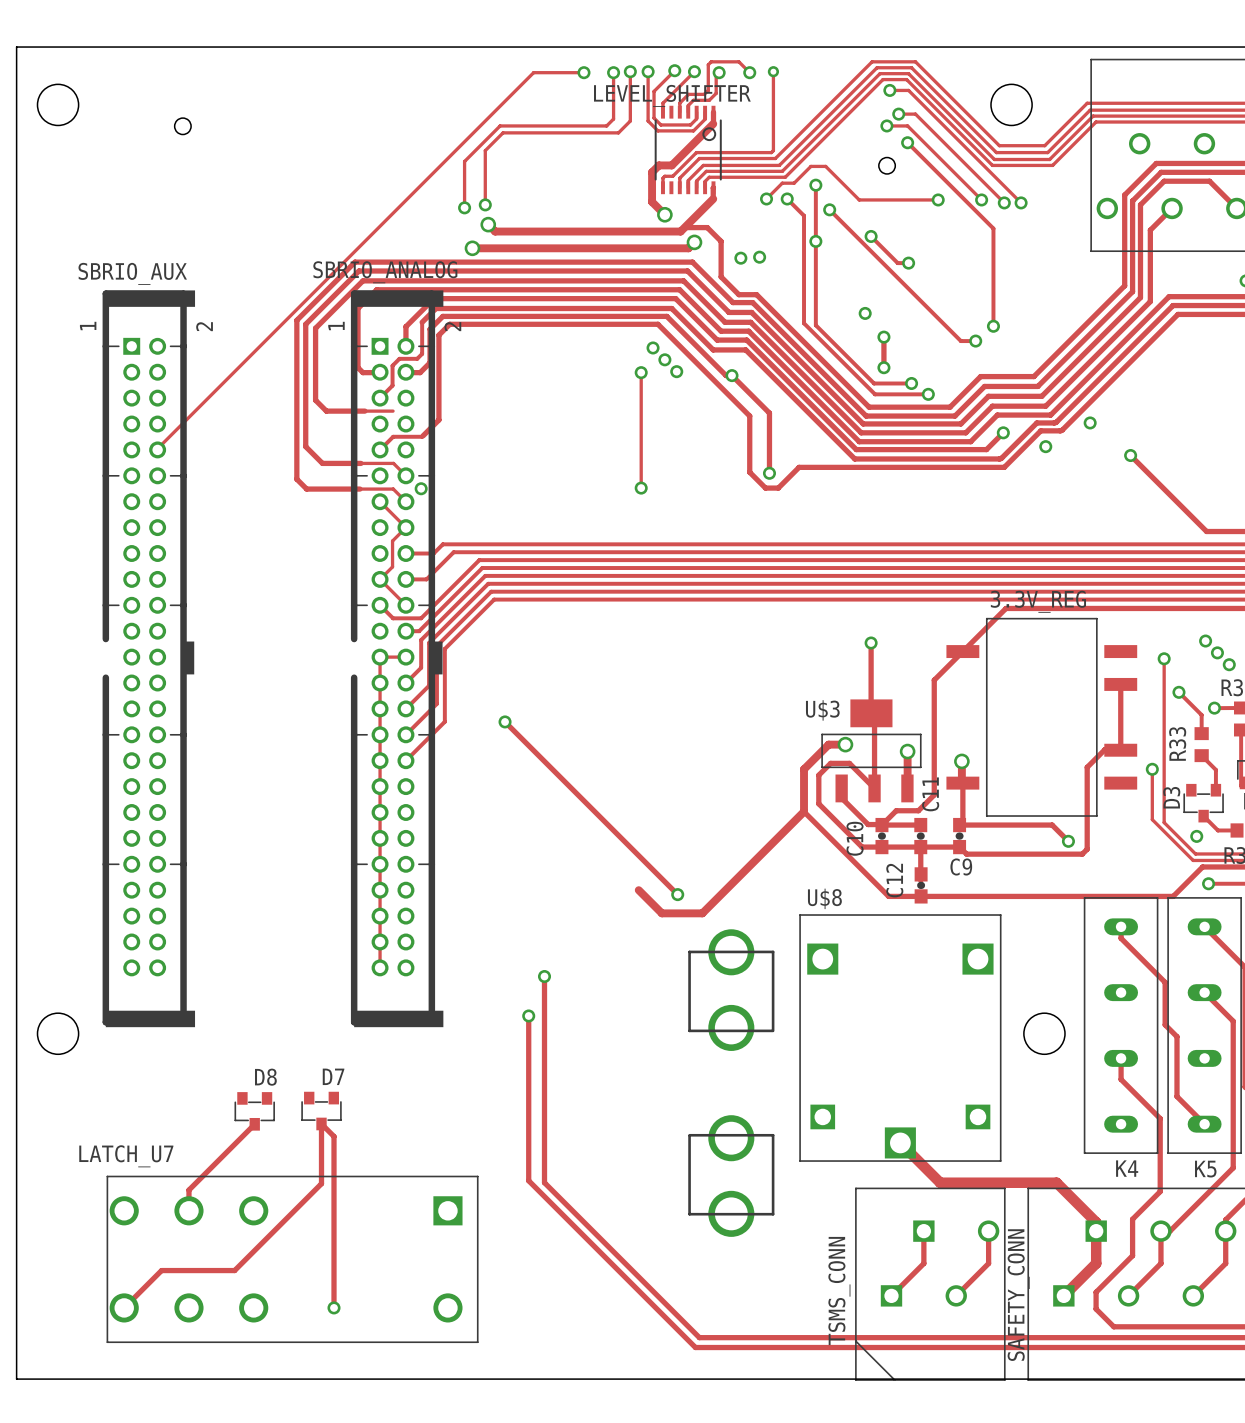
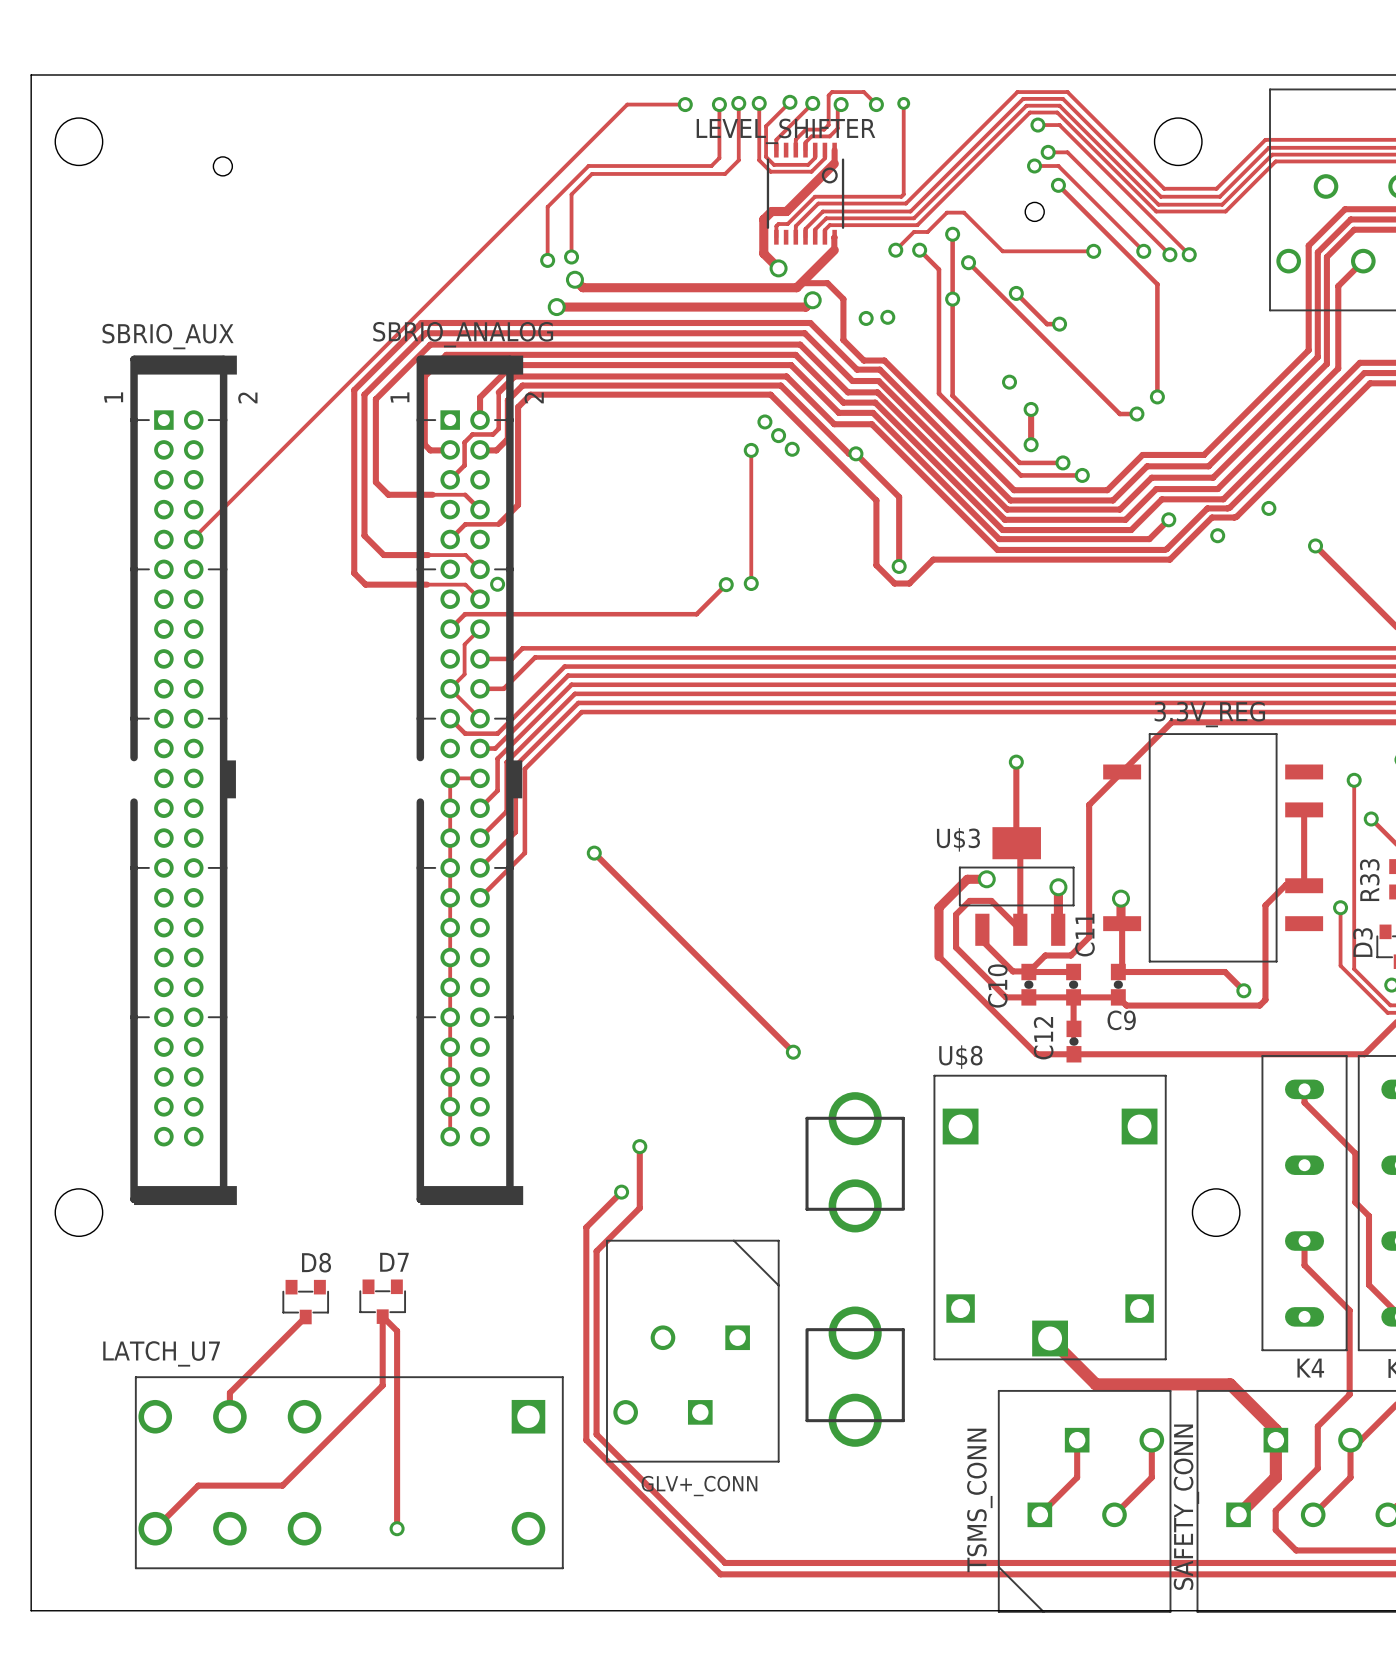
track: none -> (465, 494) (480, 509)
track: none -> (726, 584) (696, 614) (465, 614) (450, 629)
via: none -> (726, 584)
track: (380, 501) (405, 527) -> none
track: (804, 811) (702, 913) (661, 913) (638, 890) -> none
track: (528, 1015) (528, 1180) (695, 1347) -> (621, 1192) (586, 1227) (586, 1440) (720, 1574) (813, 1574)
track: (544, 1029) (544, 1182) (699, 1337) -> (639, 1208) (596, 1251) (596, 1434) (725, 1562) (818, 1562)
GLV+_CONN: none -> (692, 1351)

